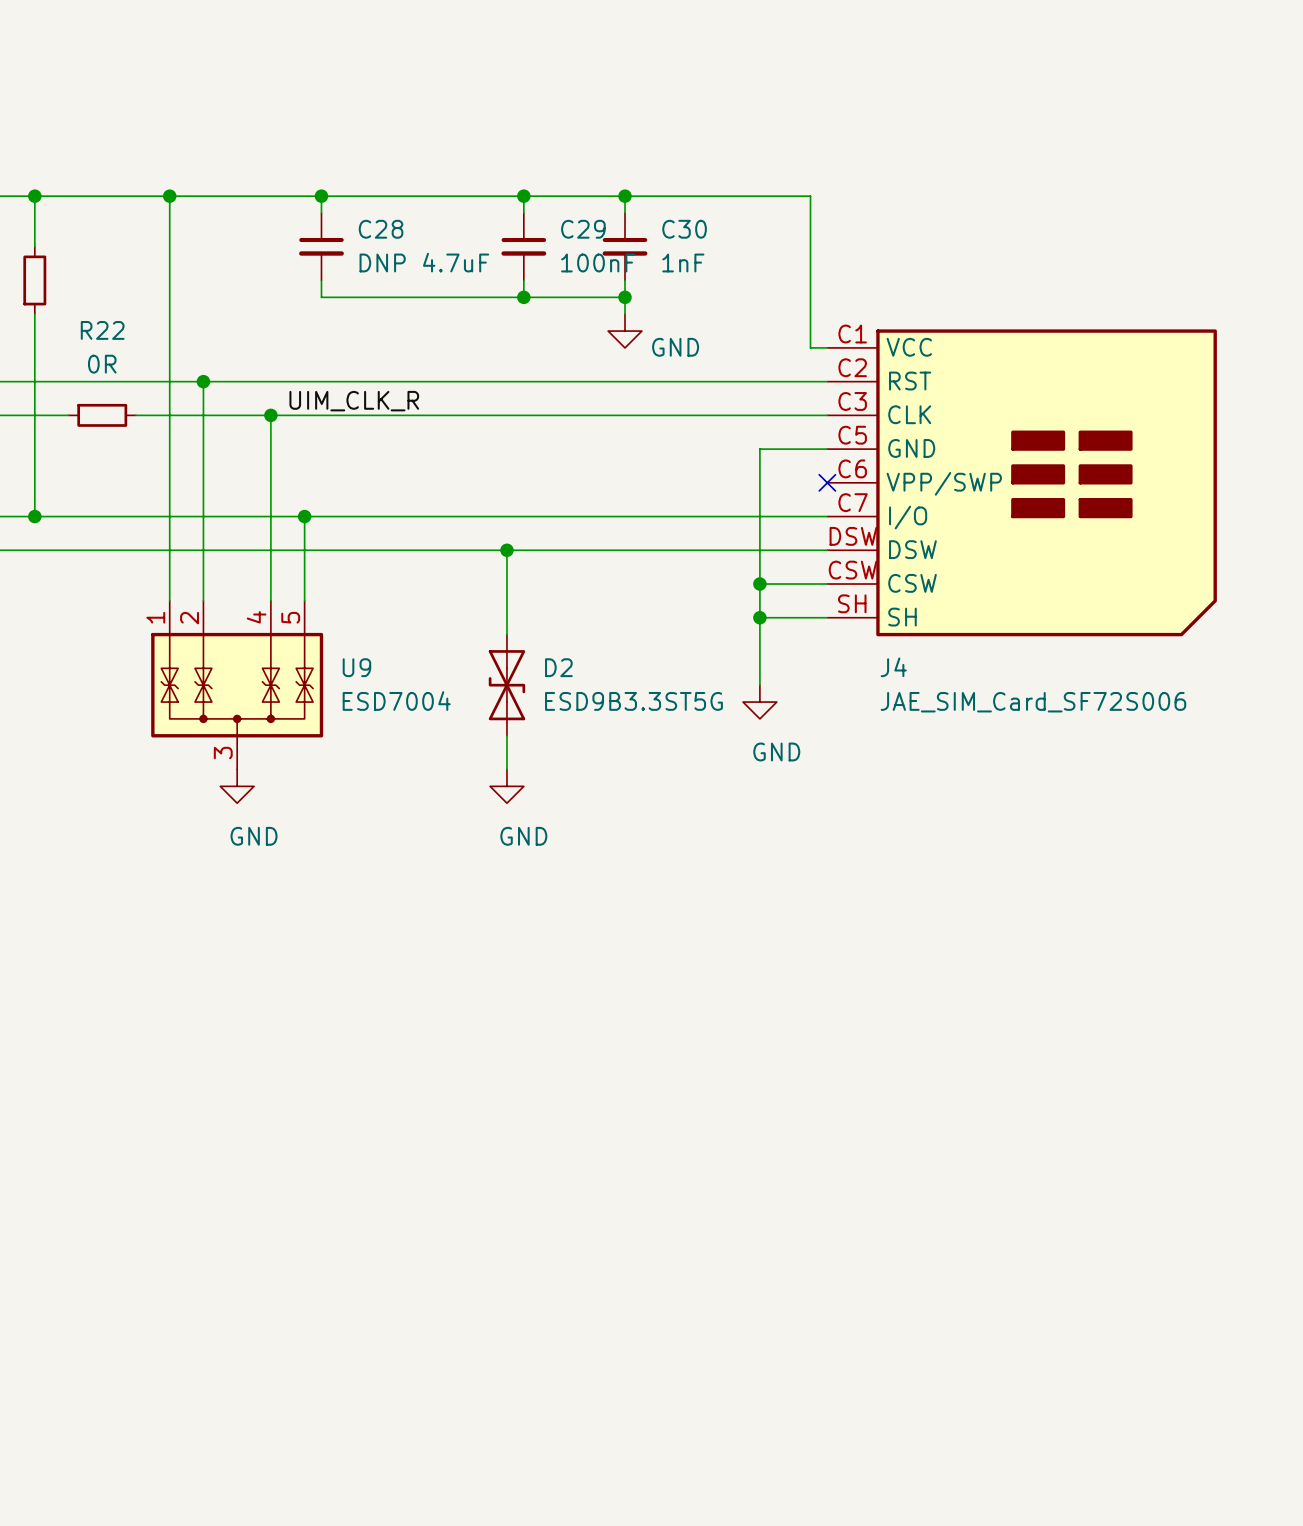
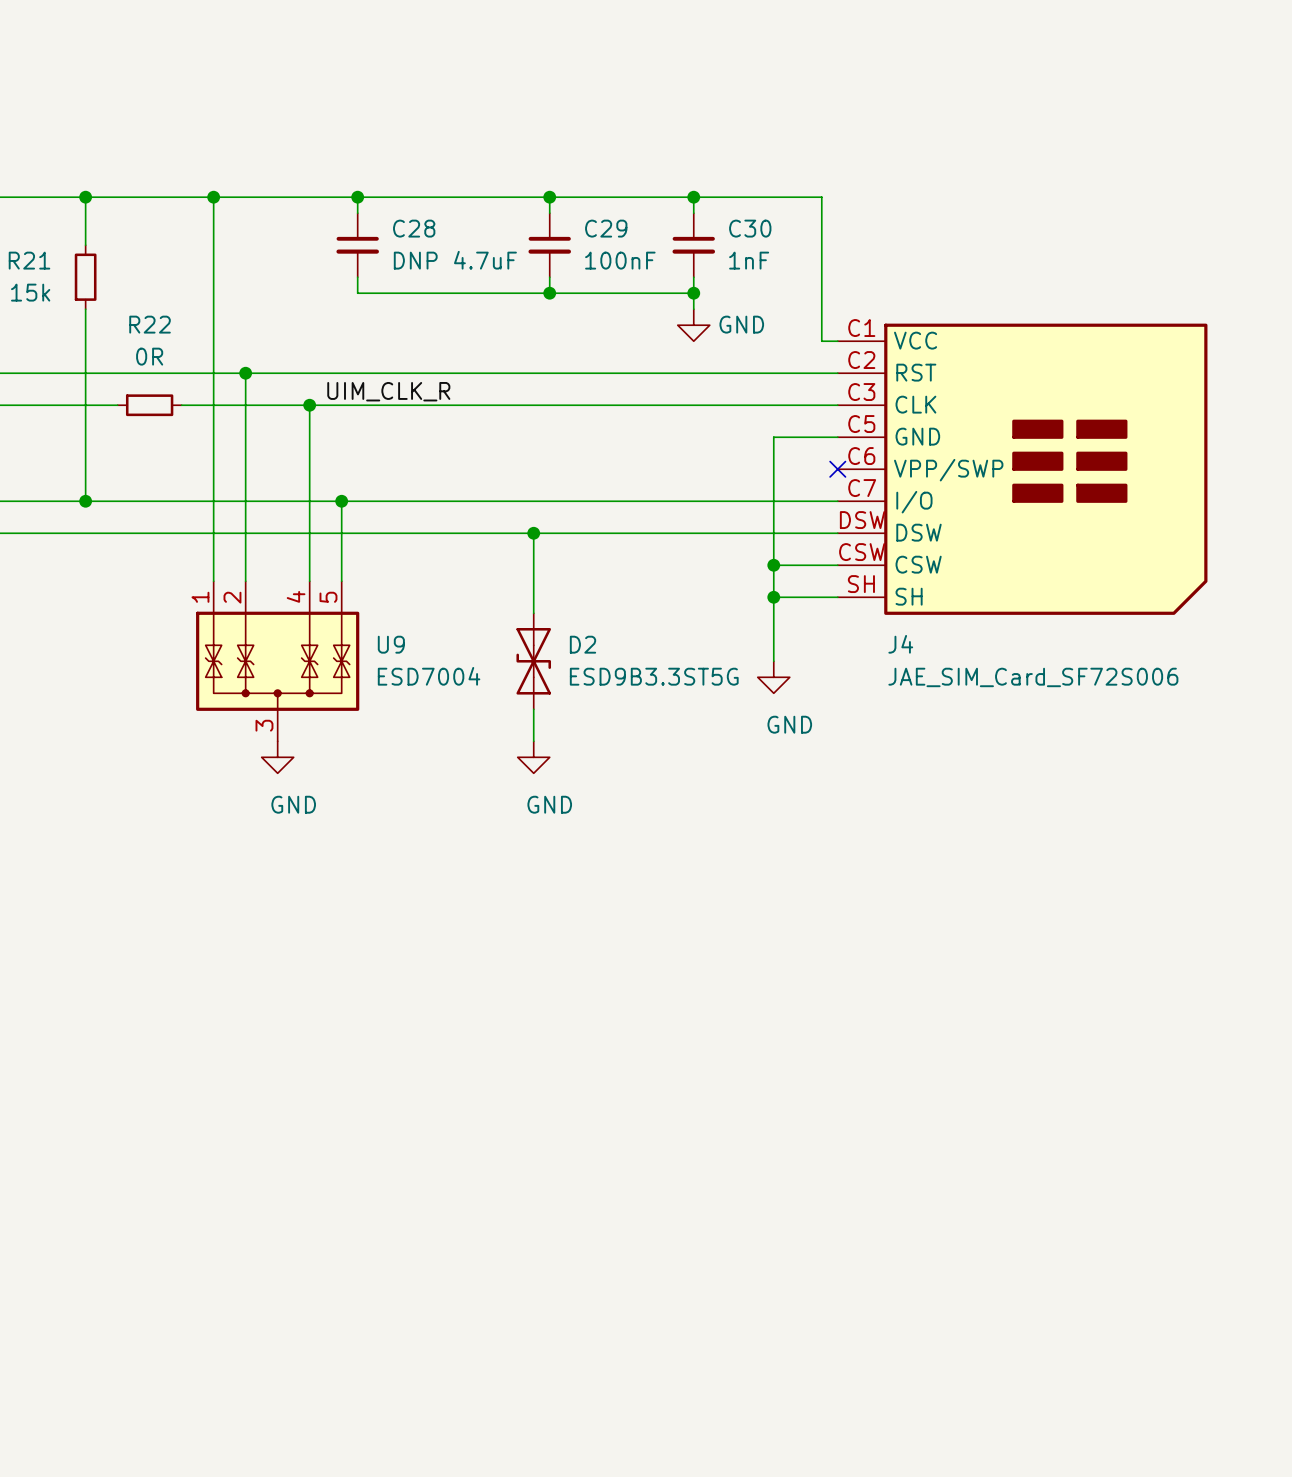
wire: (625, 196) (625, 213) -> (693, 197) (693, 213)
junction position: (625, 196) -> (693, 197)
C30 position: (625, 246) -> (693, 245)
wire: (625, 280) (625, 314) -> (693, 277) (693, 309)
wire: none -> (645, 293) (693, 293)
junction position: (625, 297) -> (693, 293)
power symbol position: GND (625, 331) -> GND (693, 325)
power symbol text position: GND (675, 347) -> GND (741, 324)

